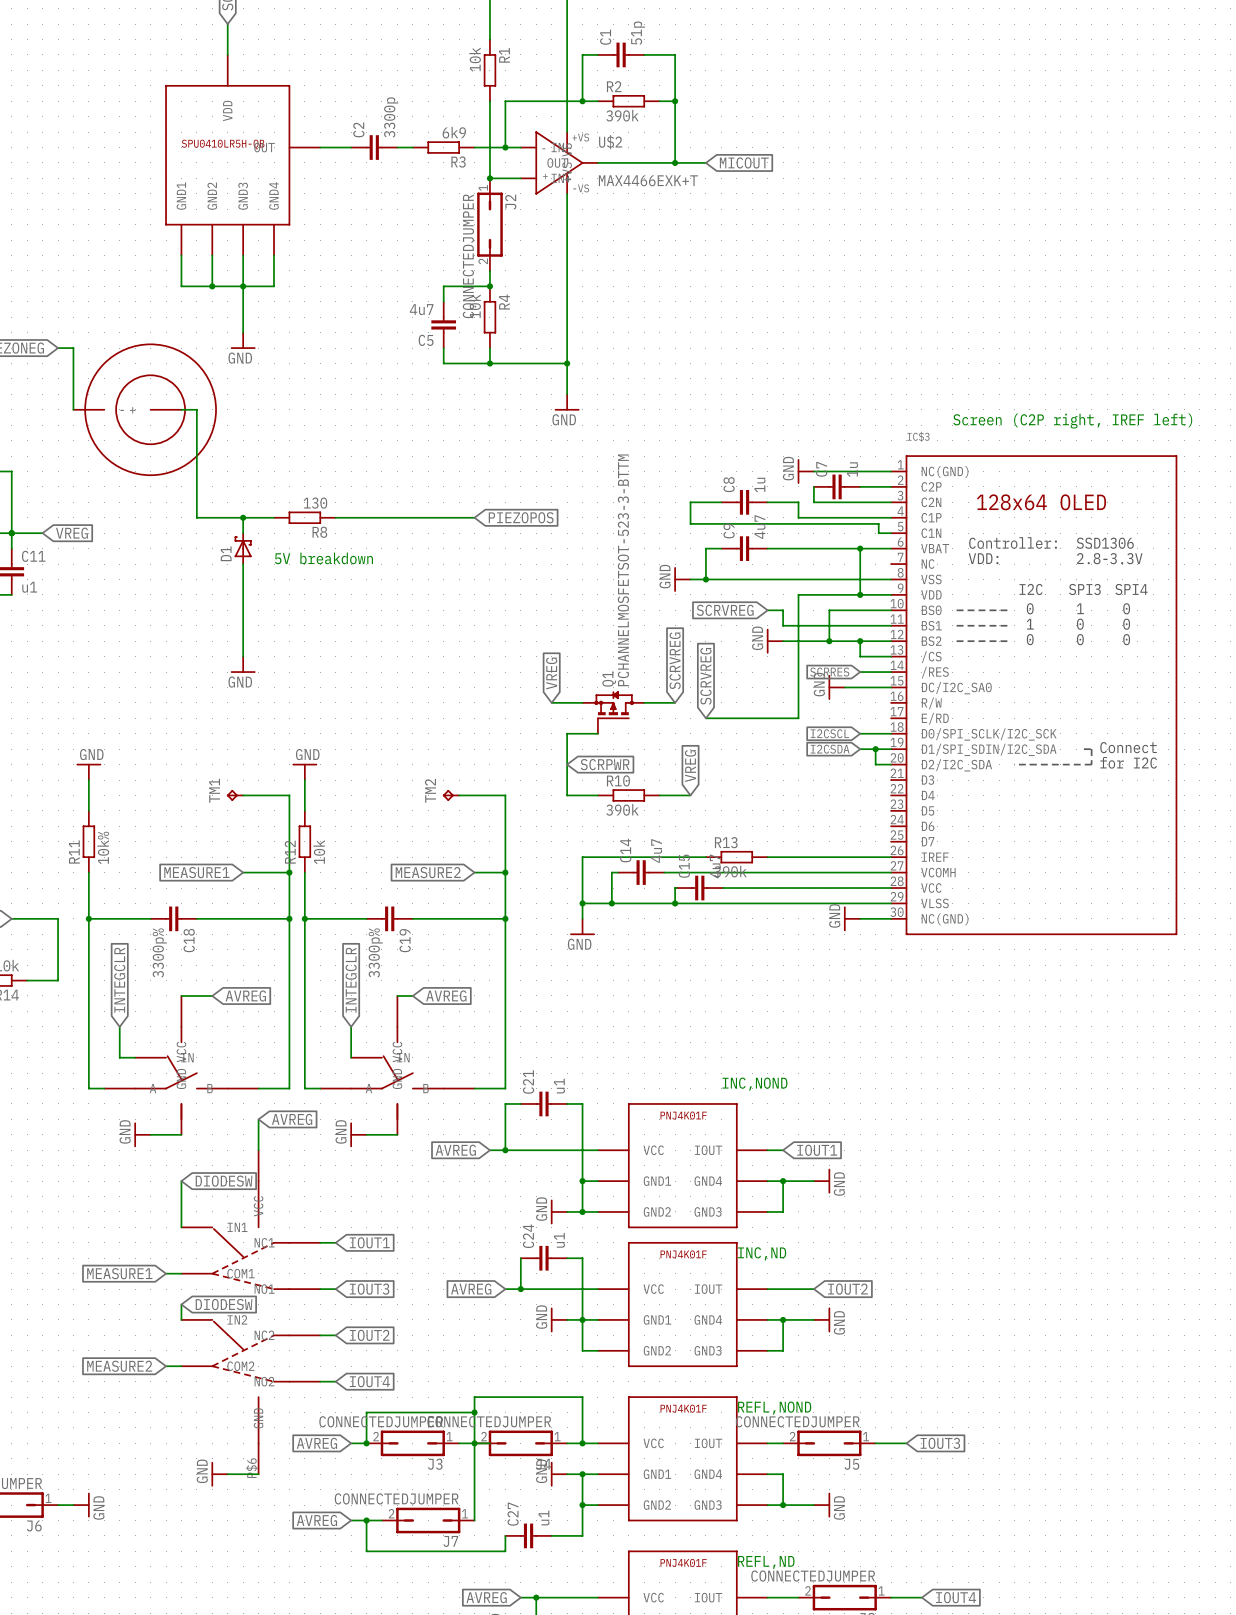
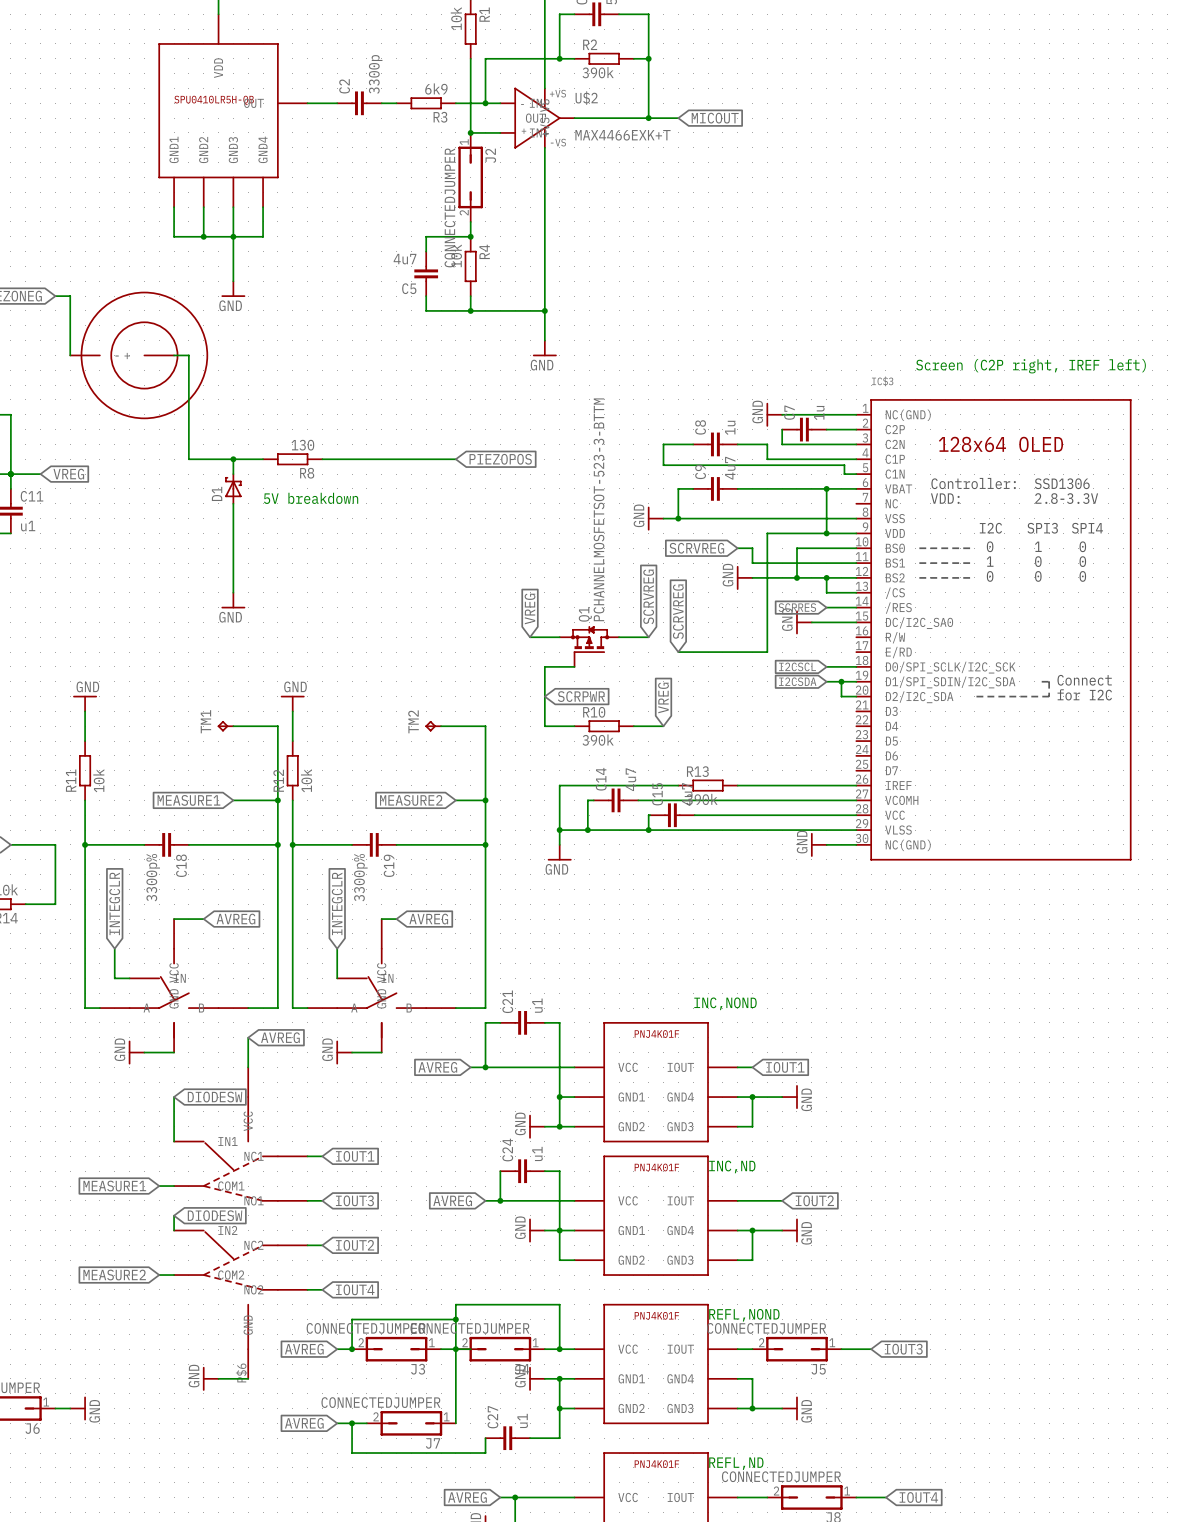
R11 value: 10k% (103, 847) -> 10k (98, 780)

